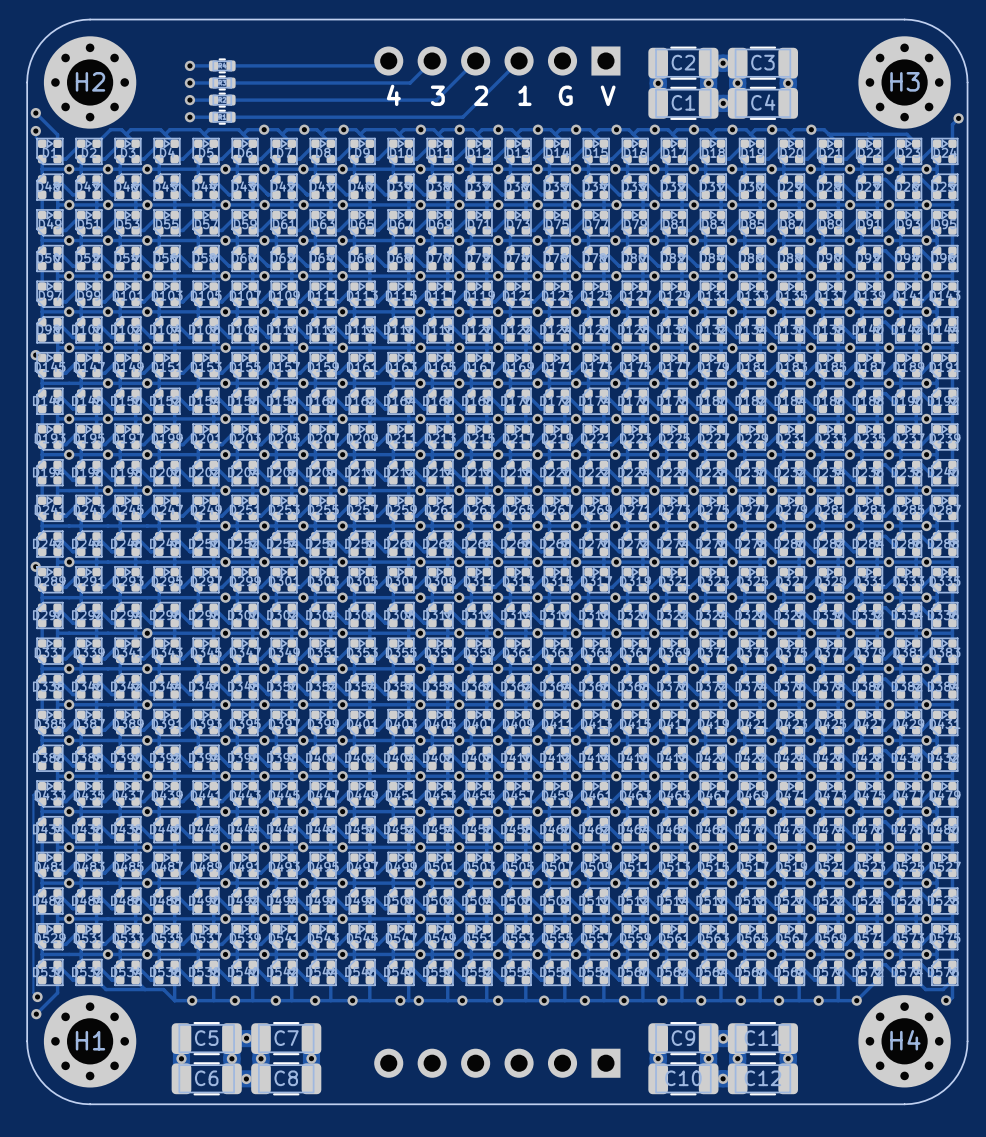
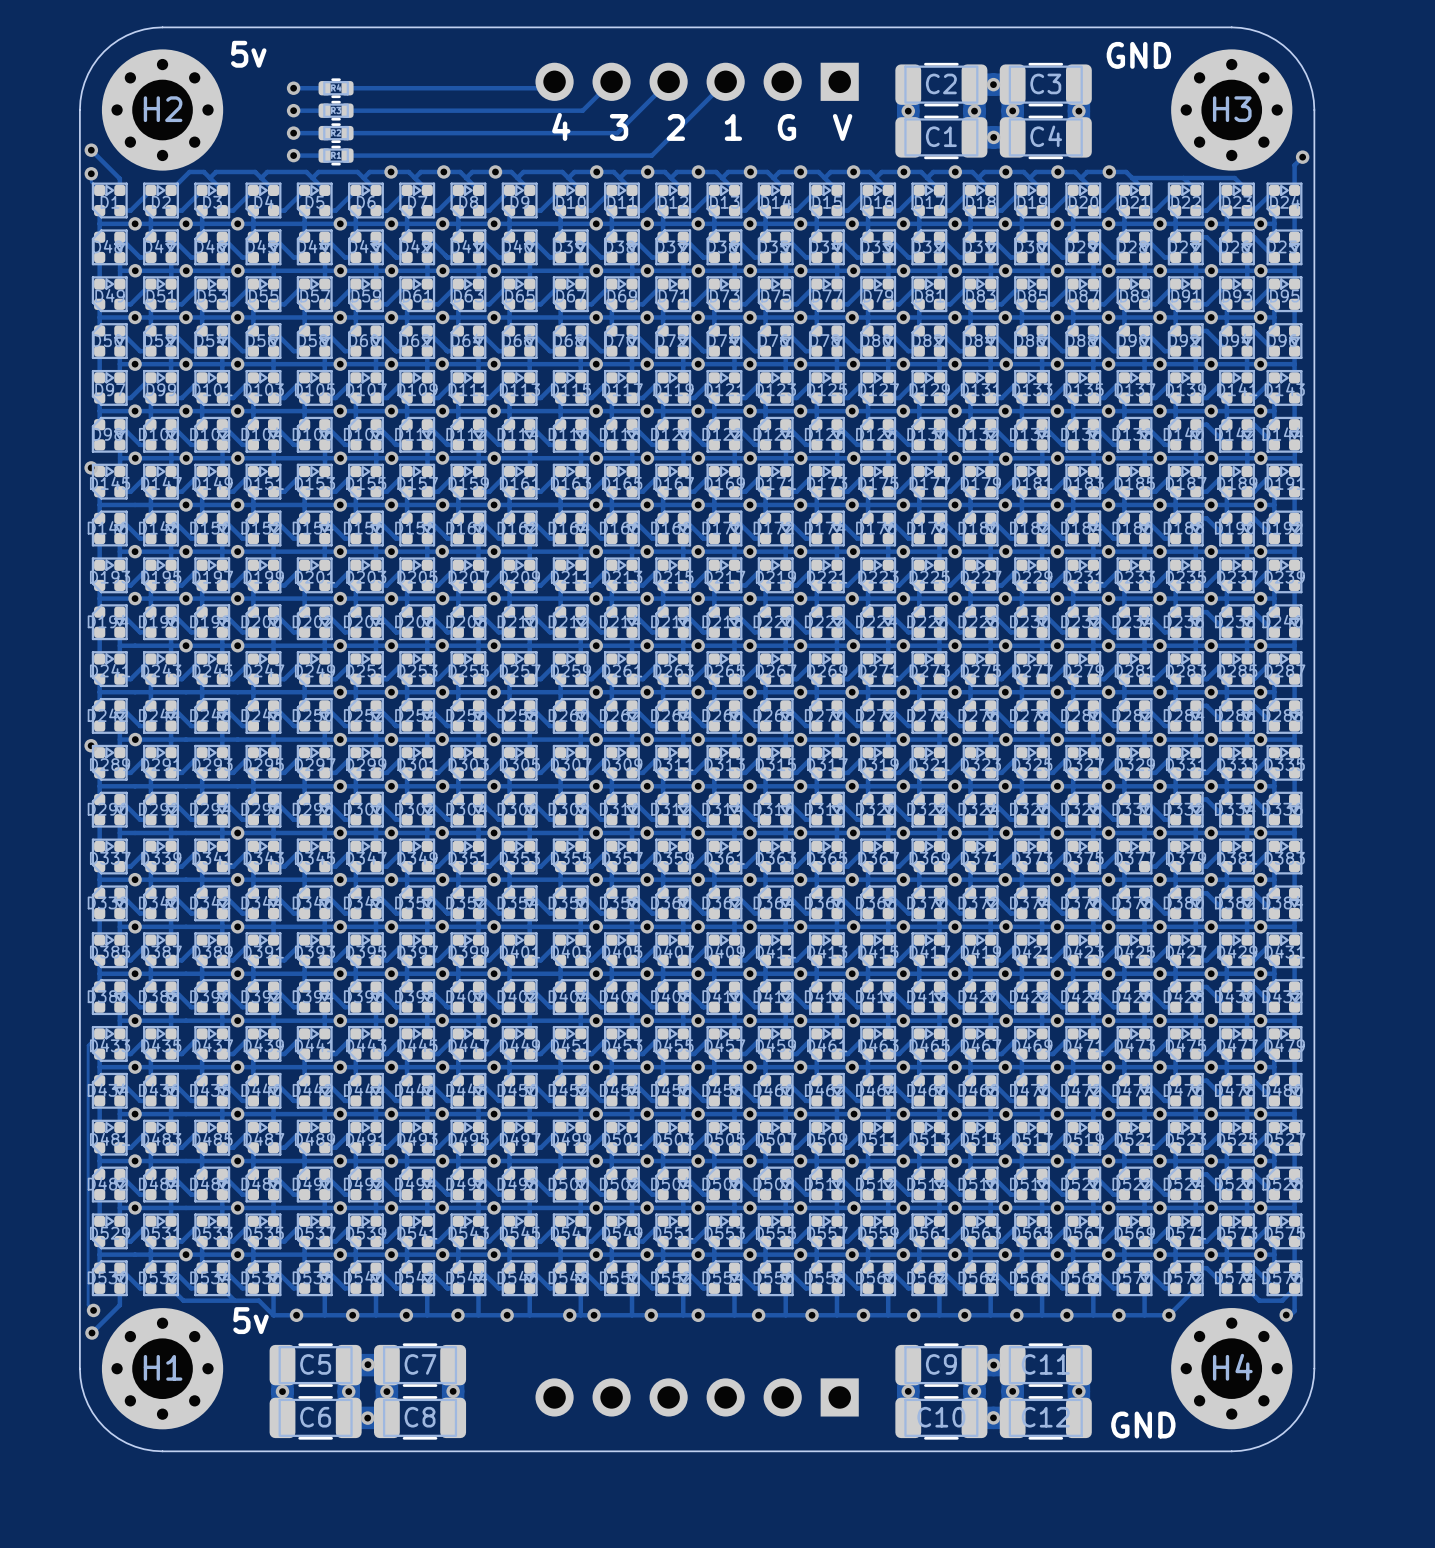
text: none -> 5v (248, 54)
text: none -> GND (1138, 55)
text: none -> 5v (251, 1320)
text: none -> GND (1143, 1425)

